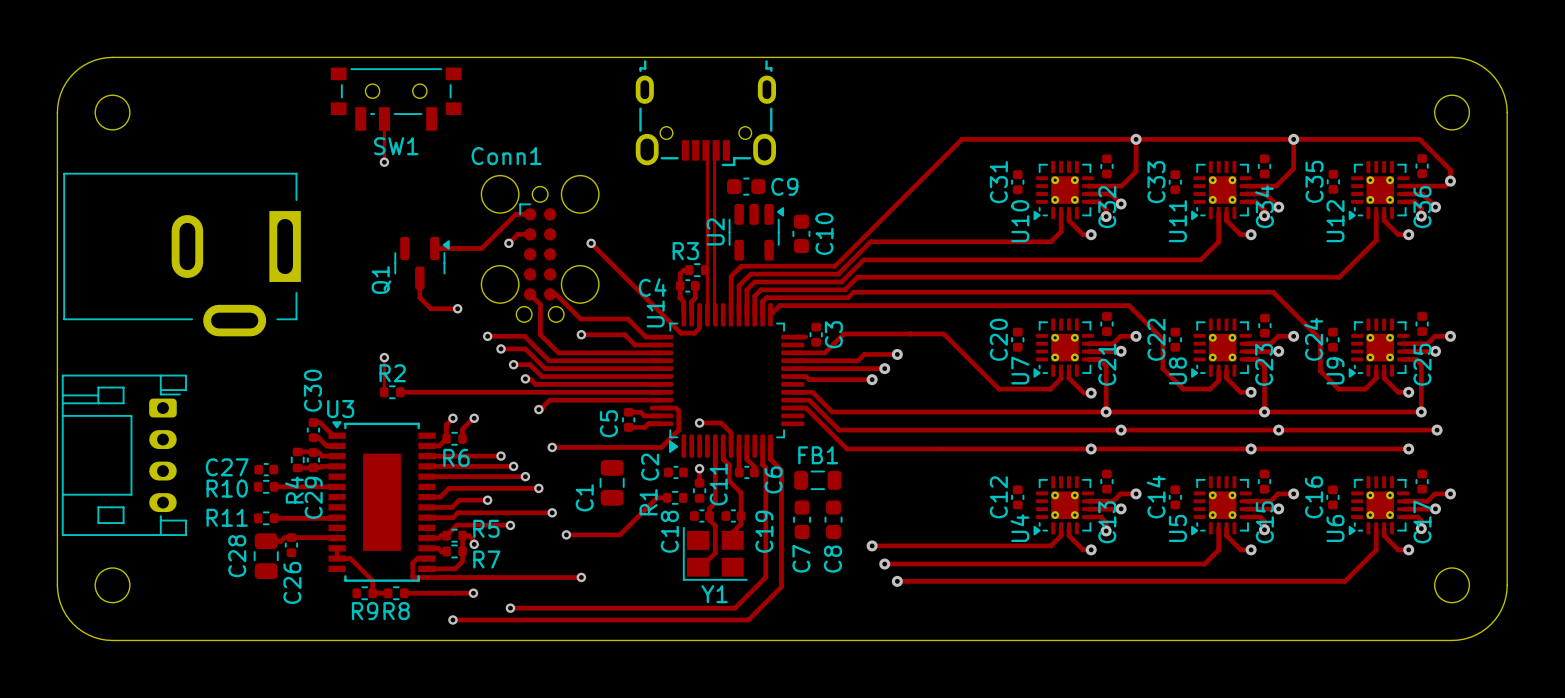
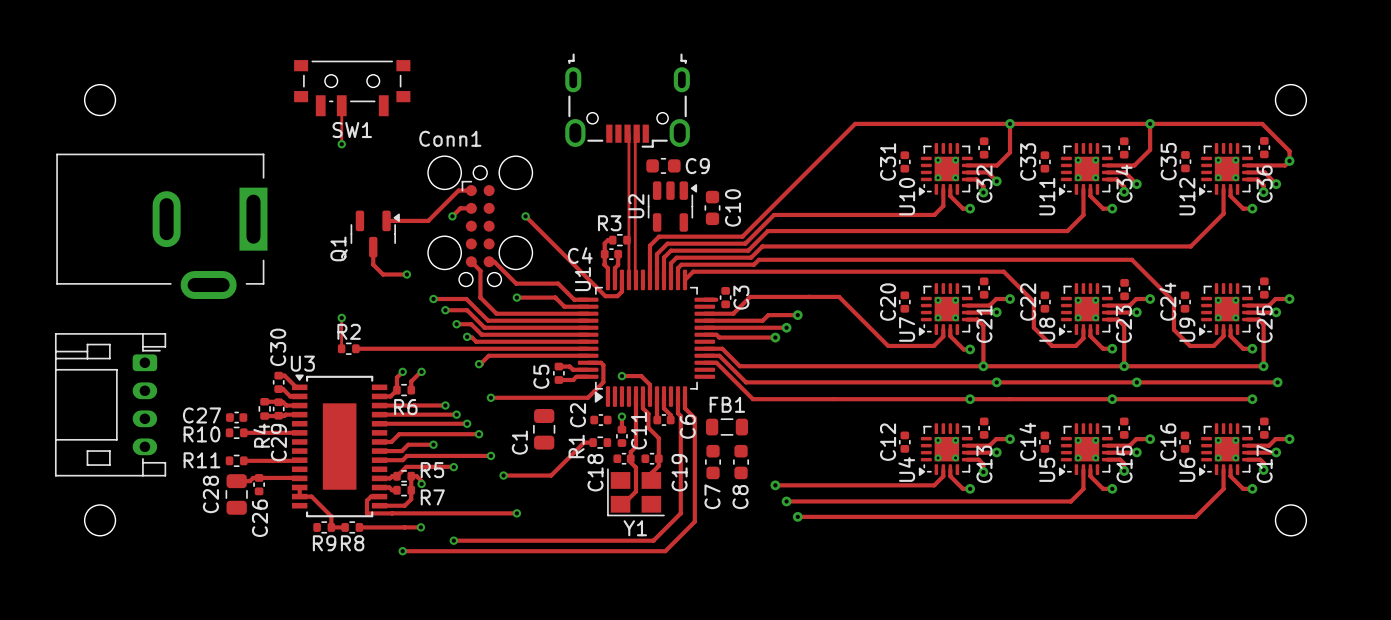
board edge: (112, 57) (1452, 57) (1470, 60) (1481, 65) (1495, 78) (1504, 94) (1506, 106) (1507, 585) (1504, 603) (1498, 614) (1486, 628) (1470, 637) (1452, 640) (112, 640) (94, 637) (78, 628) (69, 619) (60, 603) (57, 591) (57, 112) (62, 88) (73, 73) (88, 62) (112, 57) -> none

